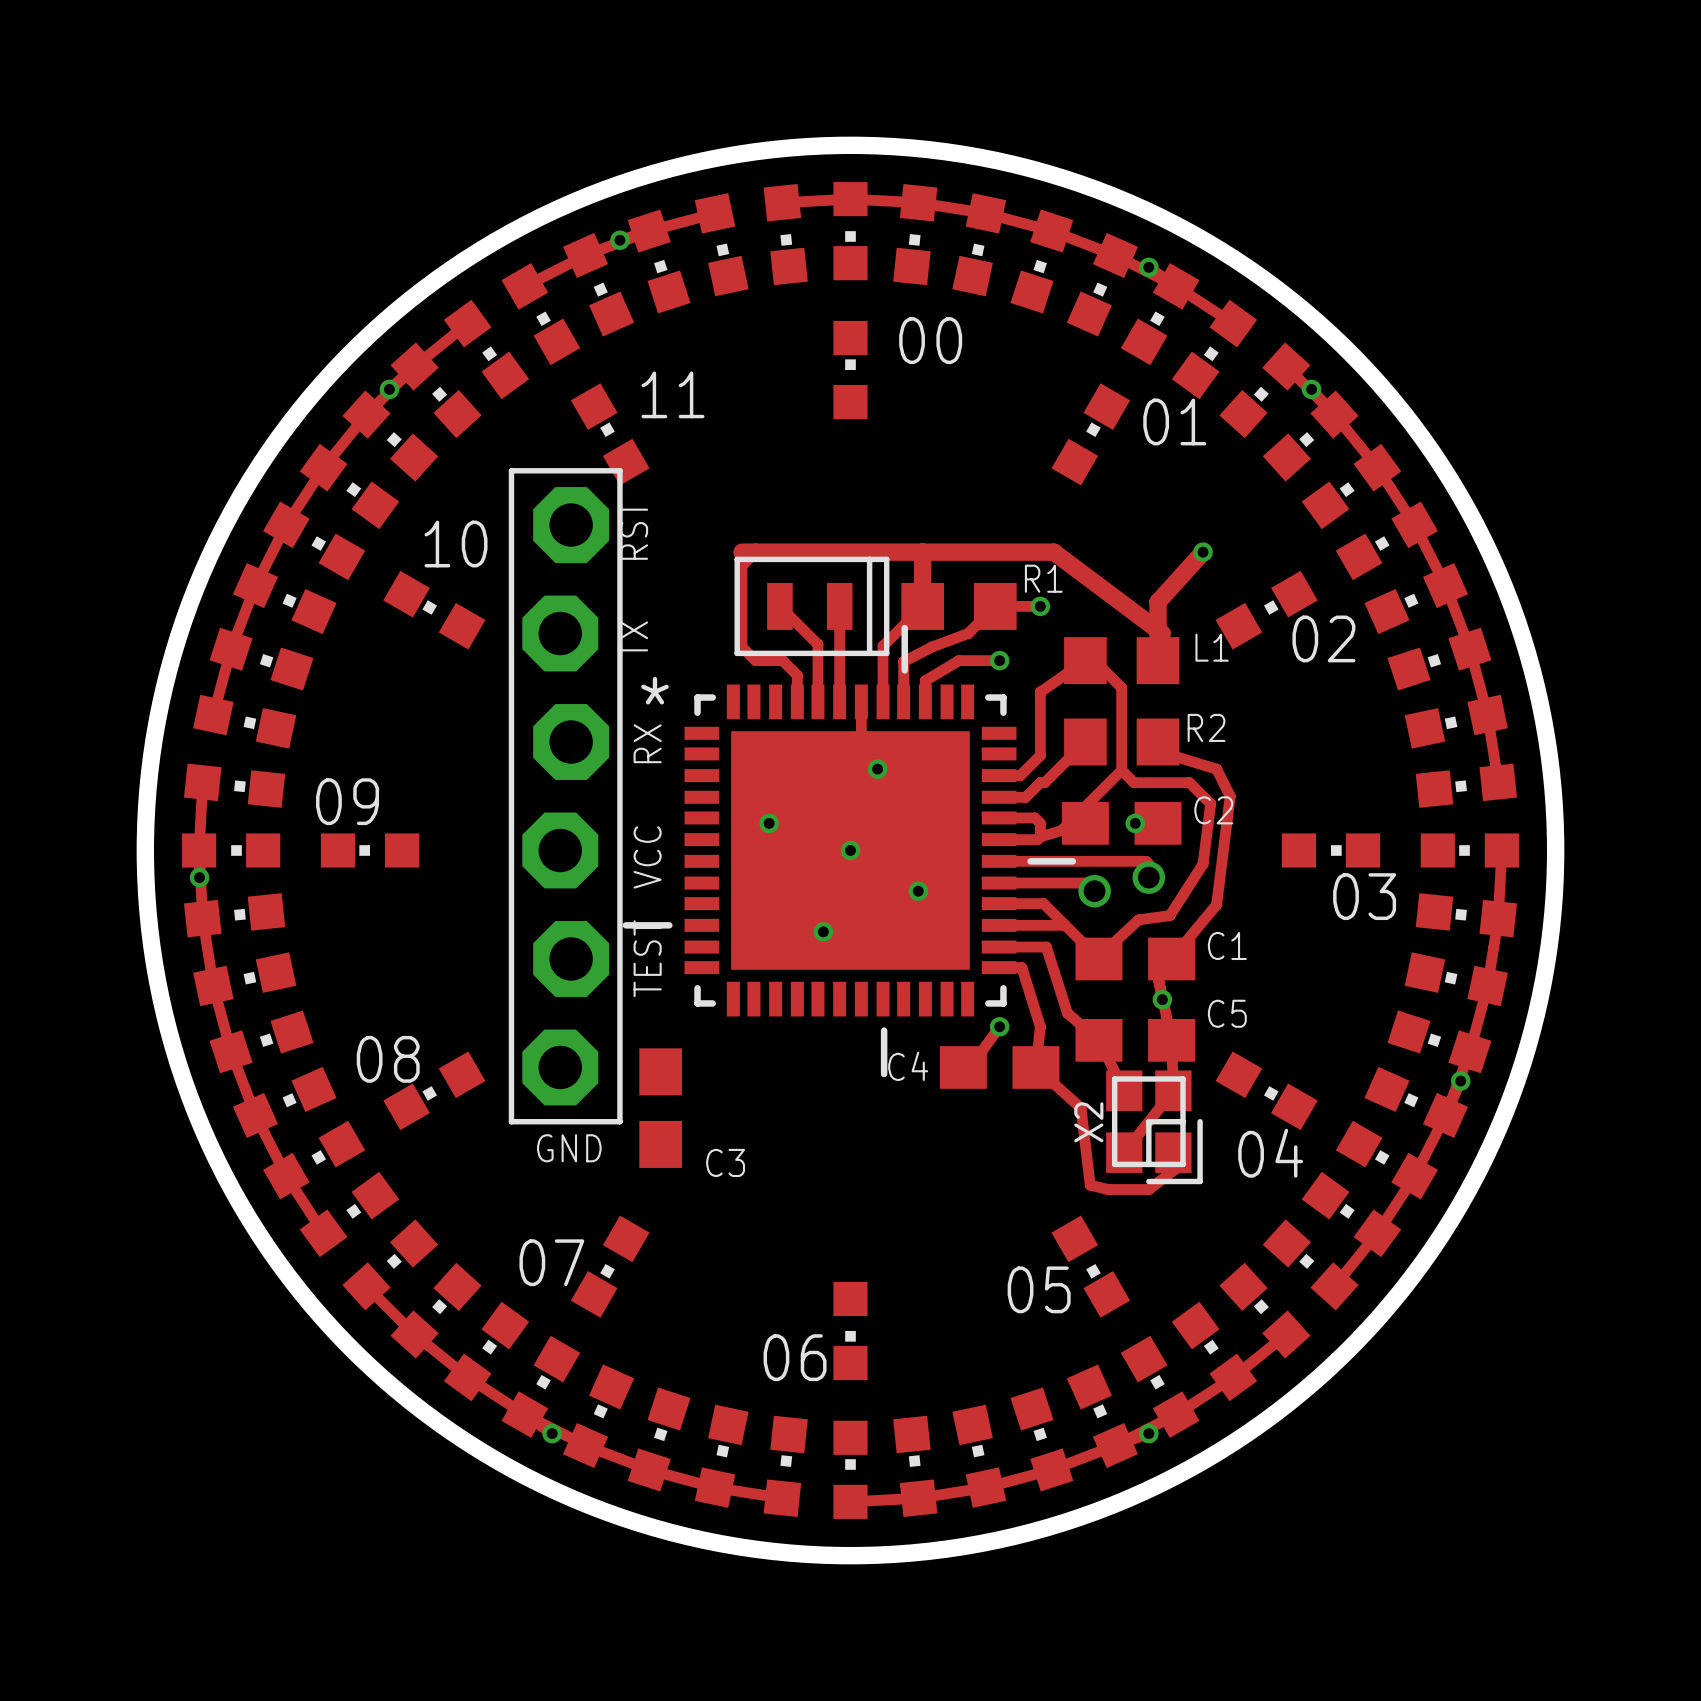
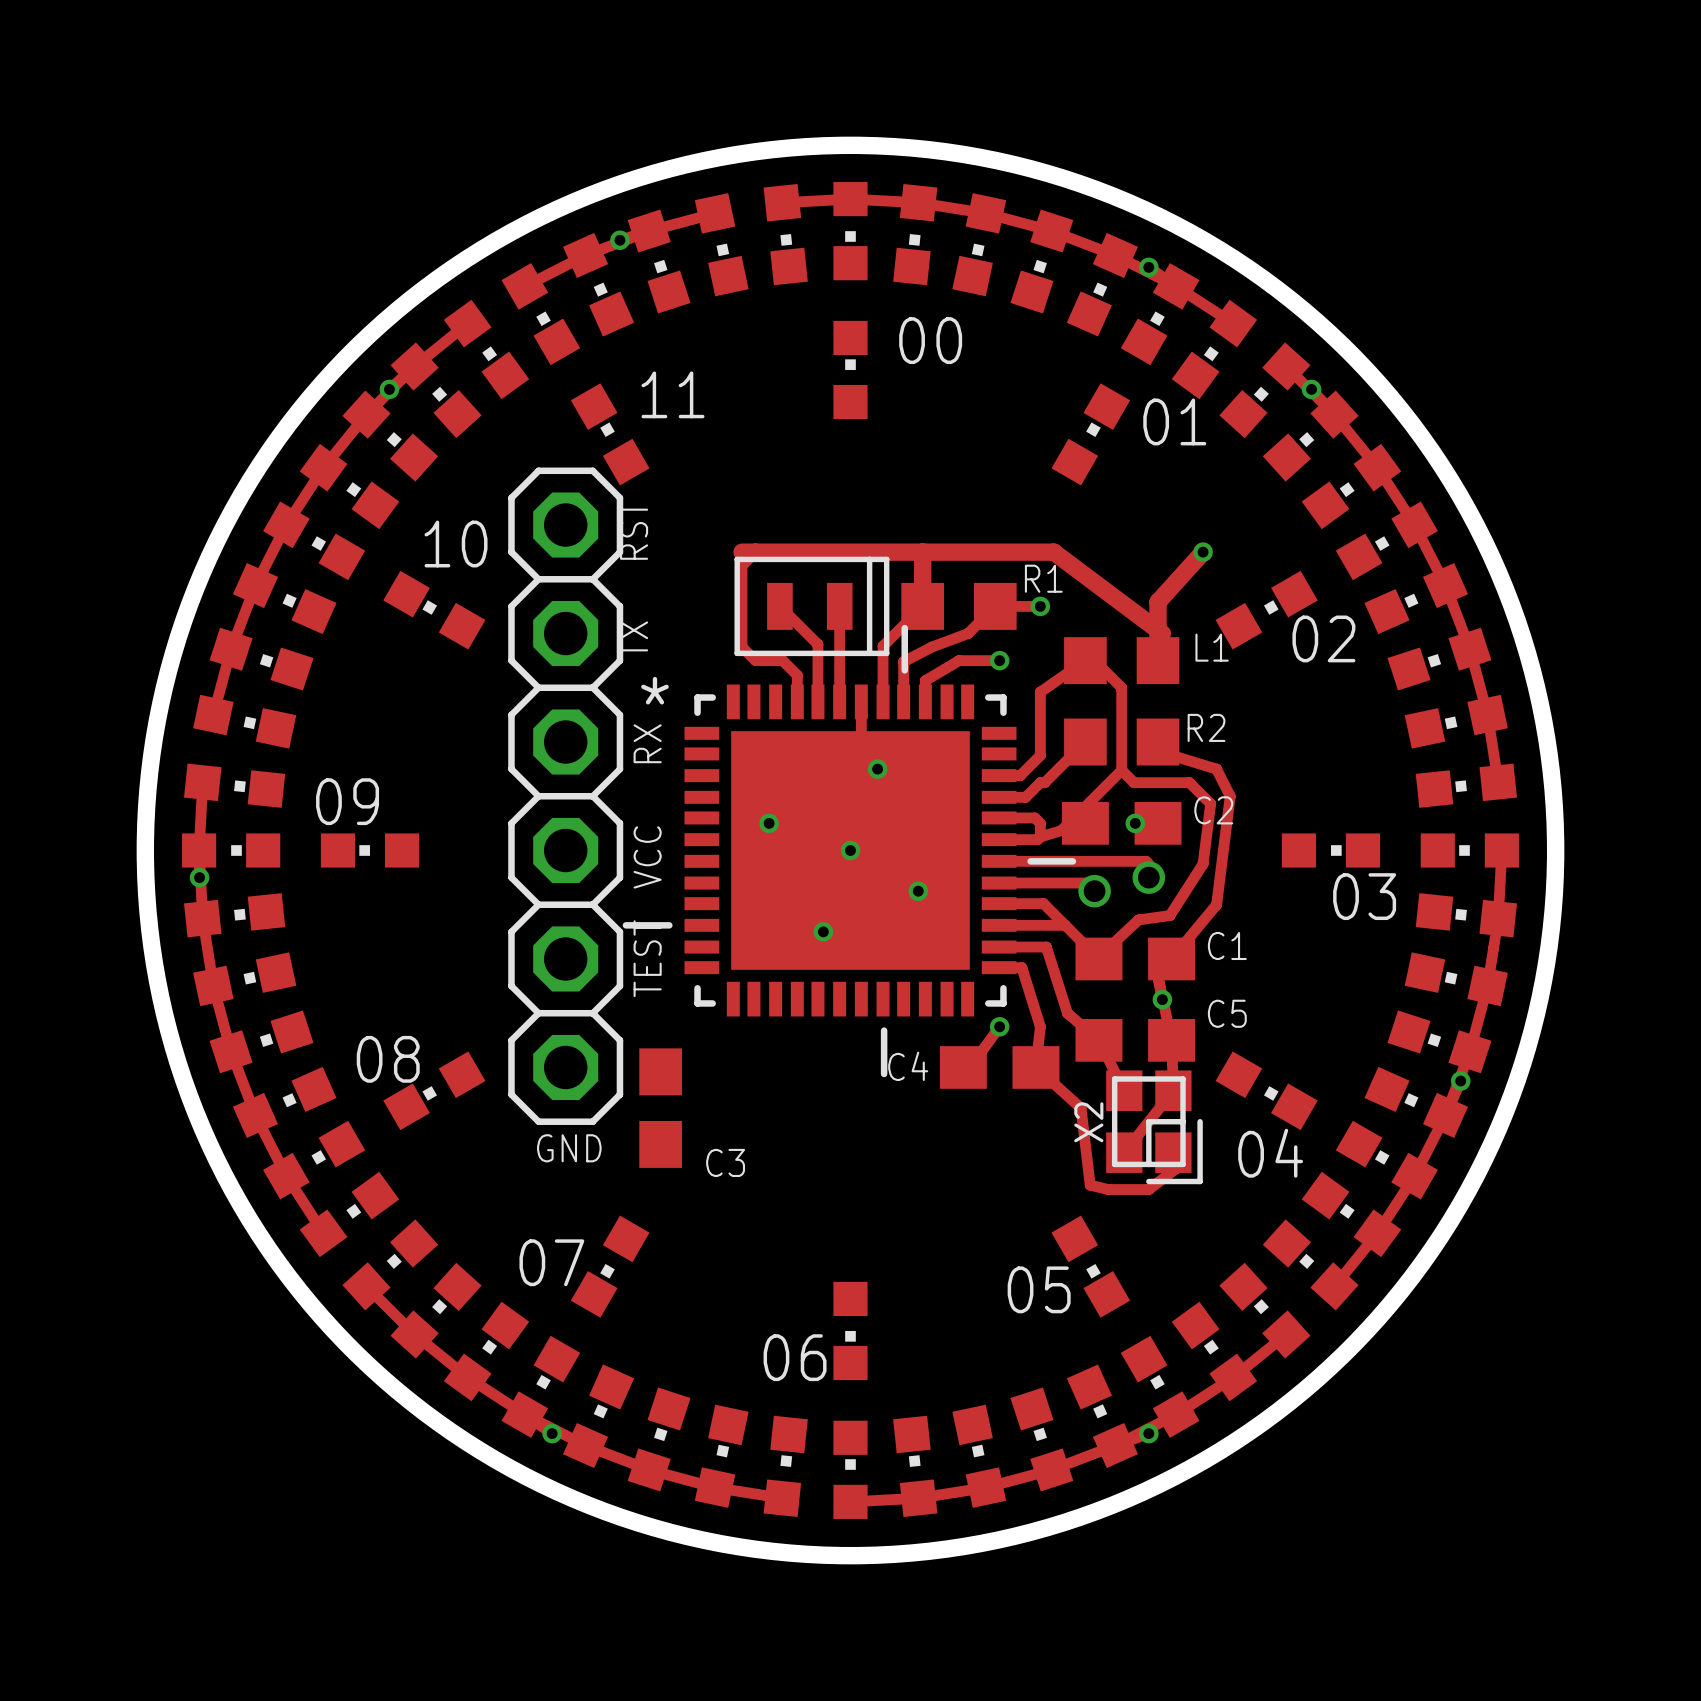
part footprint: [508, 468, 623, 1125] -> [508, 467, 624, 1125]

